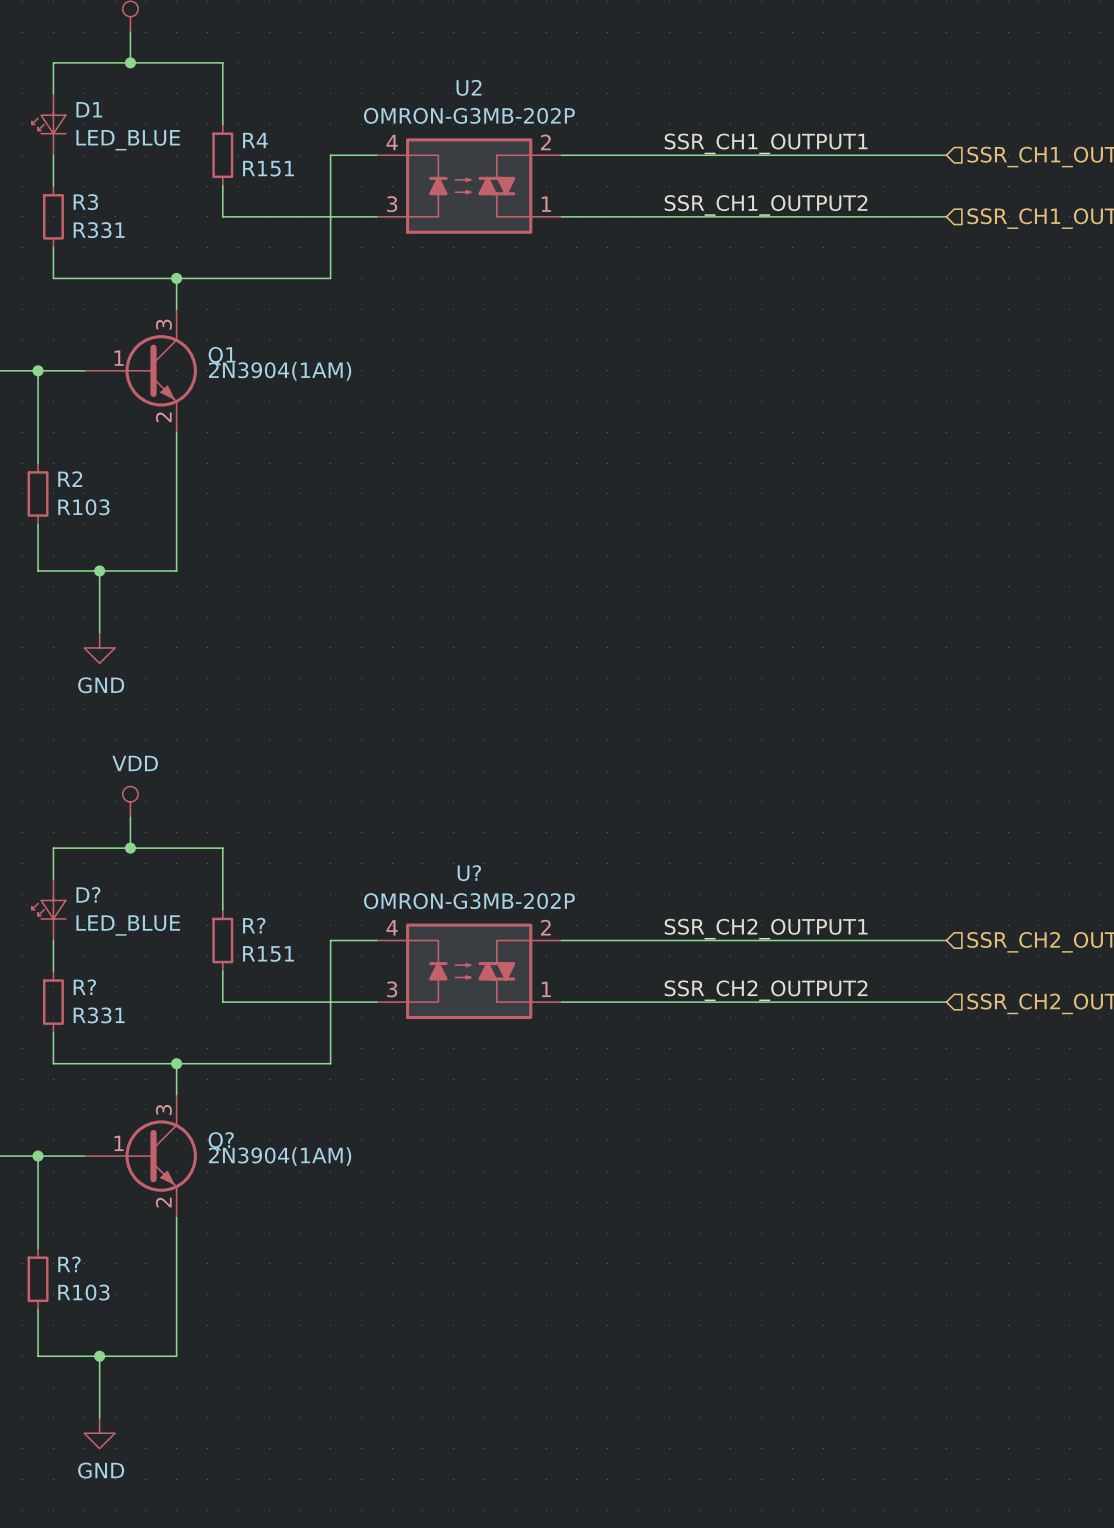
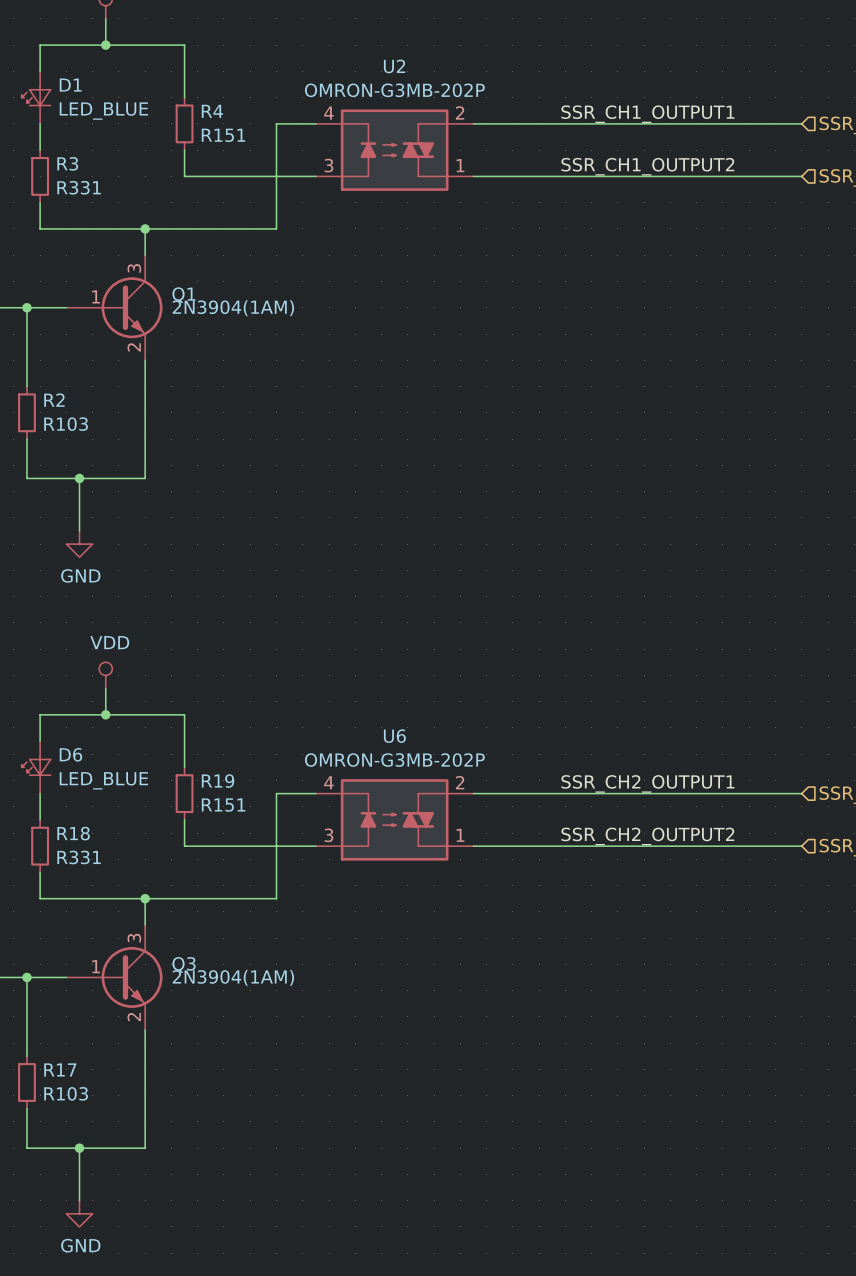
U? name: U? (469, 873) -> U6 (394, 736)
D? name: D? (88, 894) -> D6 (70, 754)
R? name: R? (254, 925) -> R19 (218, 781)
R? name: R? (84, 987) -> R18 (73, 833)
Q? name: Q? (221, 1141) -> Q3 (184, 964)
R? name: R? (69, 1264) -> R17 (60, 1069)

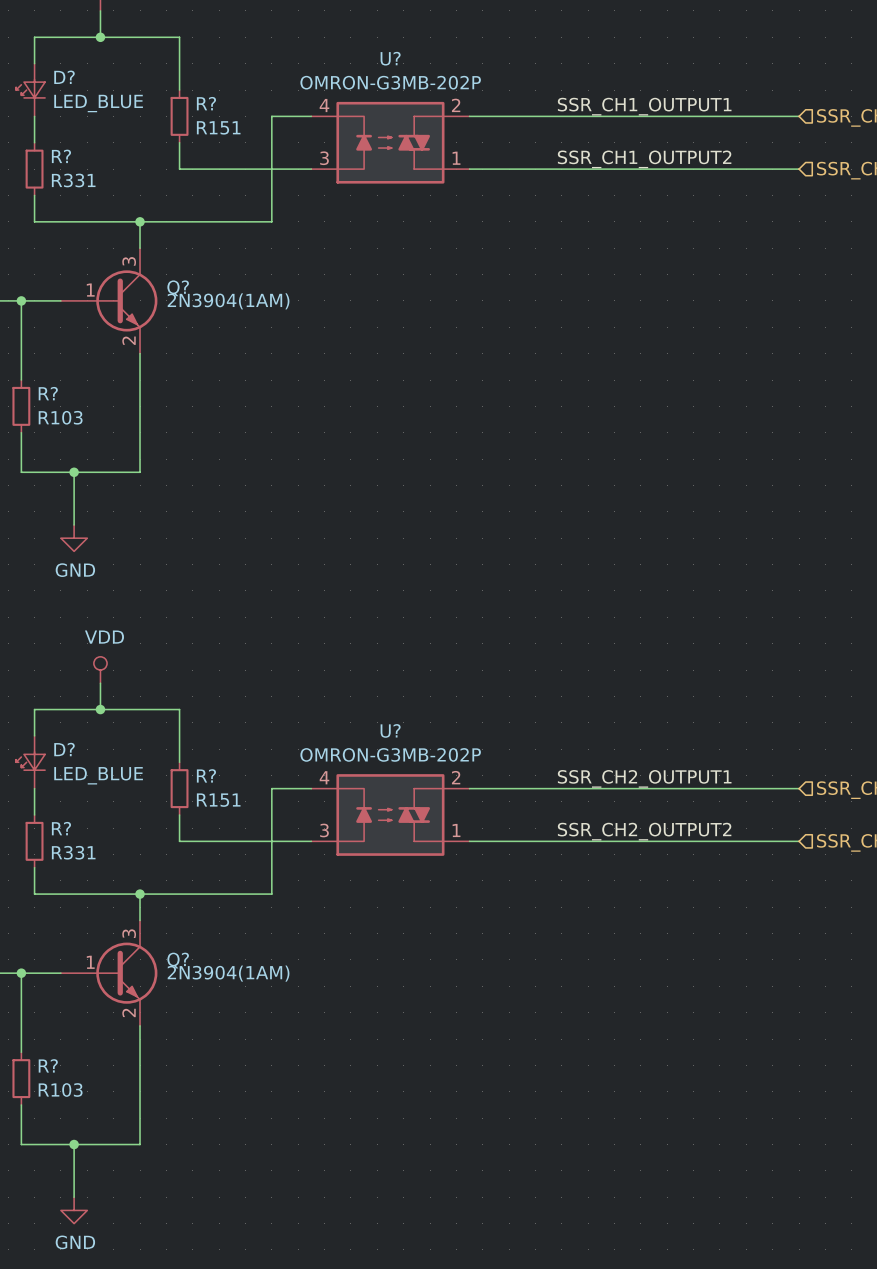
U2 name: U2 (394, 66) -> U? (390, 58)
D1 name: D1 (70, 85) -> D? (64, 77)
R4 name: R4 (212, 111) -> R? (206, 103)
R3 name: R3 (67, 163) -> R? (61, 156)
Q1 name: Q1 (183, 295) -> Q? (178, 288)
R2 name: R2 (54, 400) -> R? (48, 393)
U6 name: U6 (394, 736) -> U? (390, 730)
D6 name: D6 (70, 754) -> D? (64, 749)
R19 name: R19 (218, 781) -> R? (206, 775)
R18 name: R18 (73, 833) -> R? (61, 828)
Q3 name: Q3 (184, 964) -> Q? (178, 960)
R17 name: R17 (60, 1069) -> R? (48, 1065)

